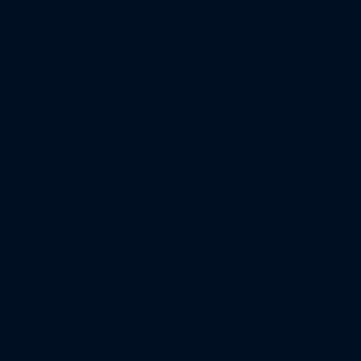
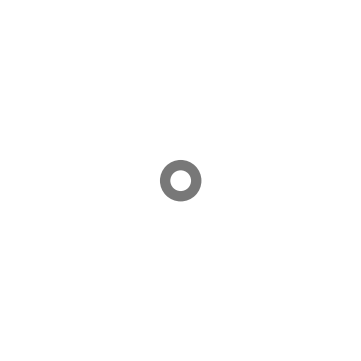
via: none -> (180, 180)

